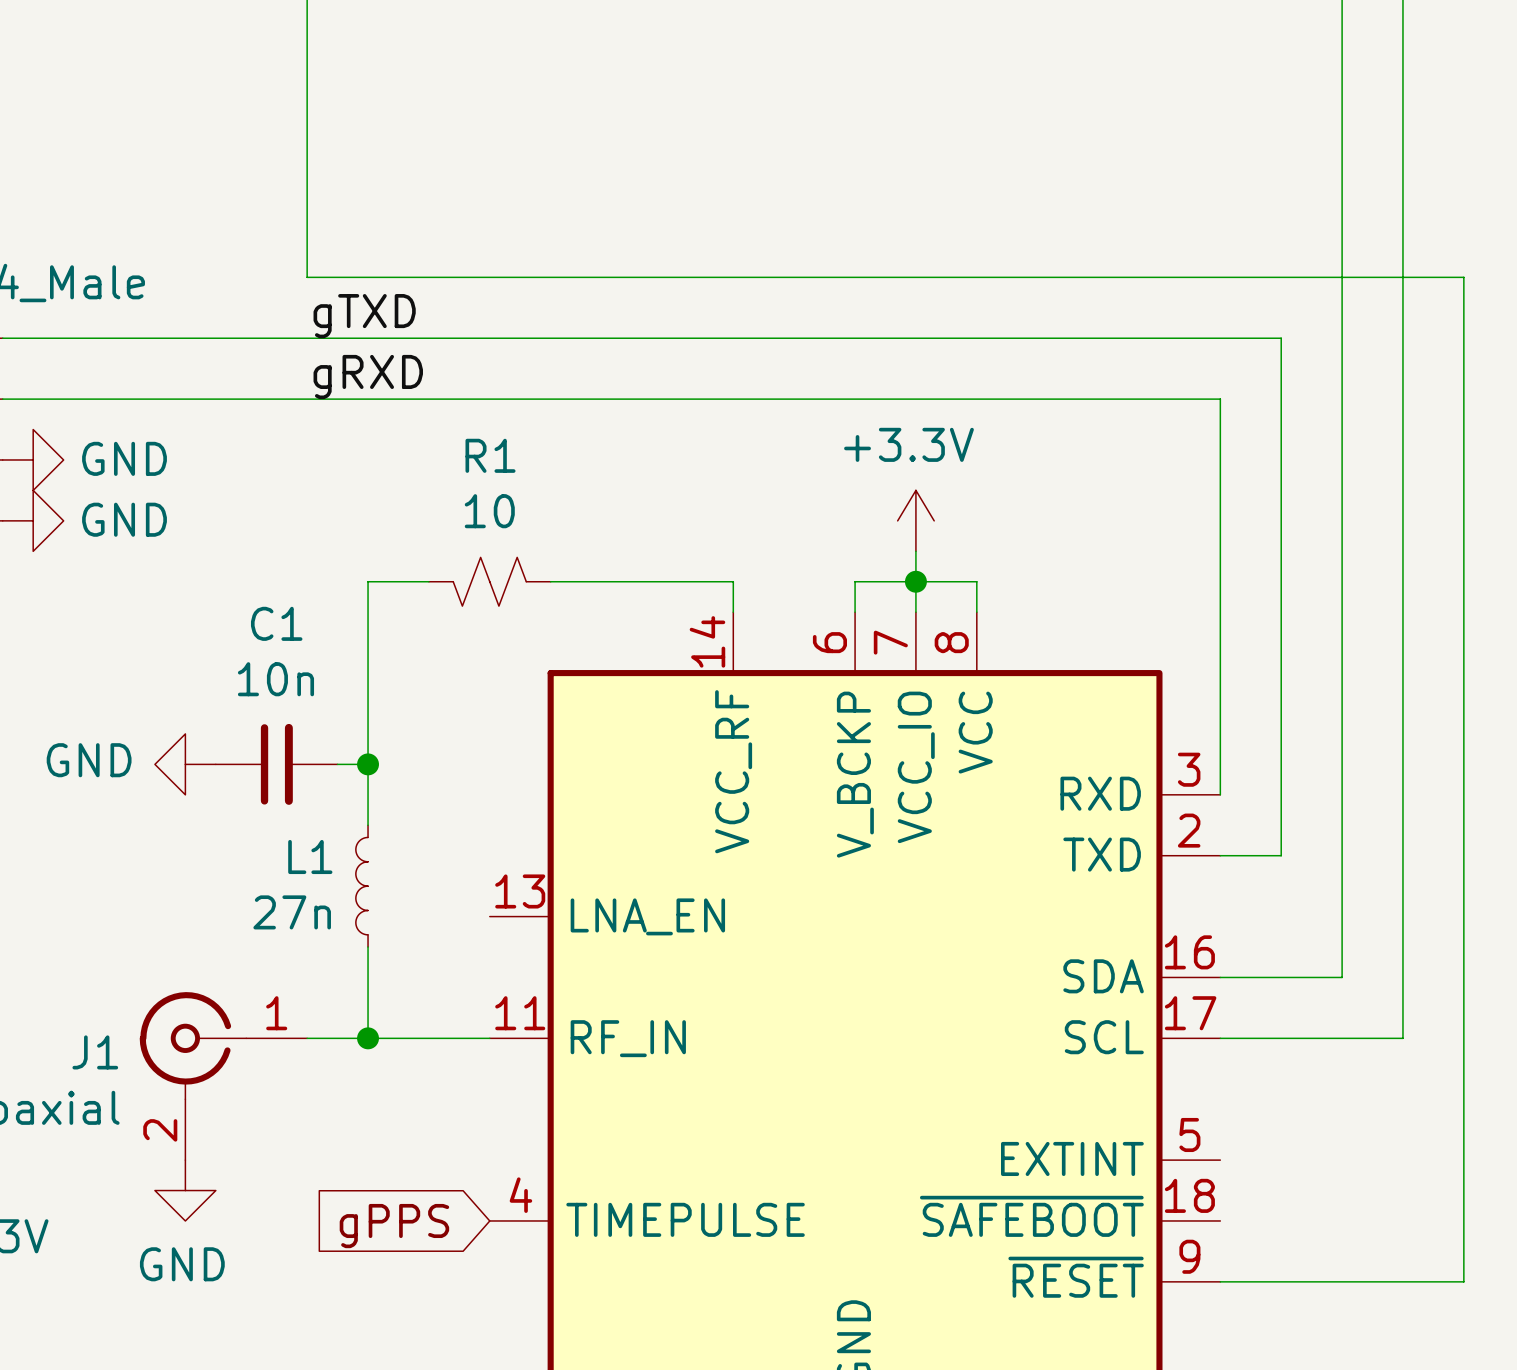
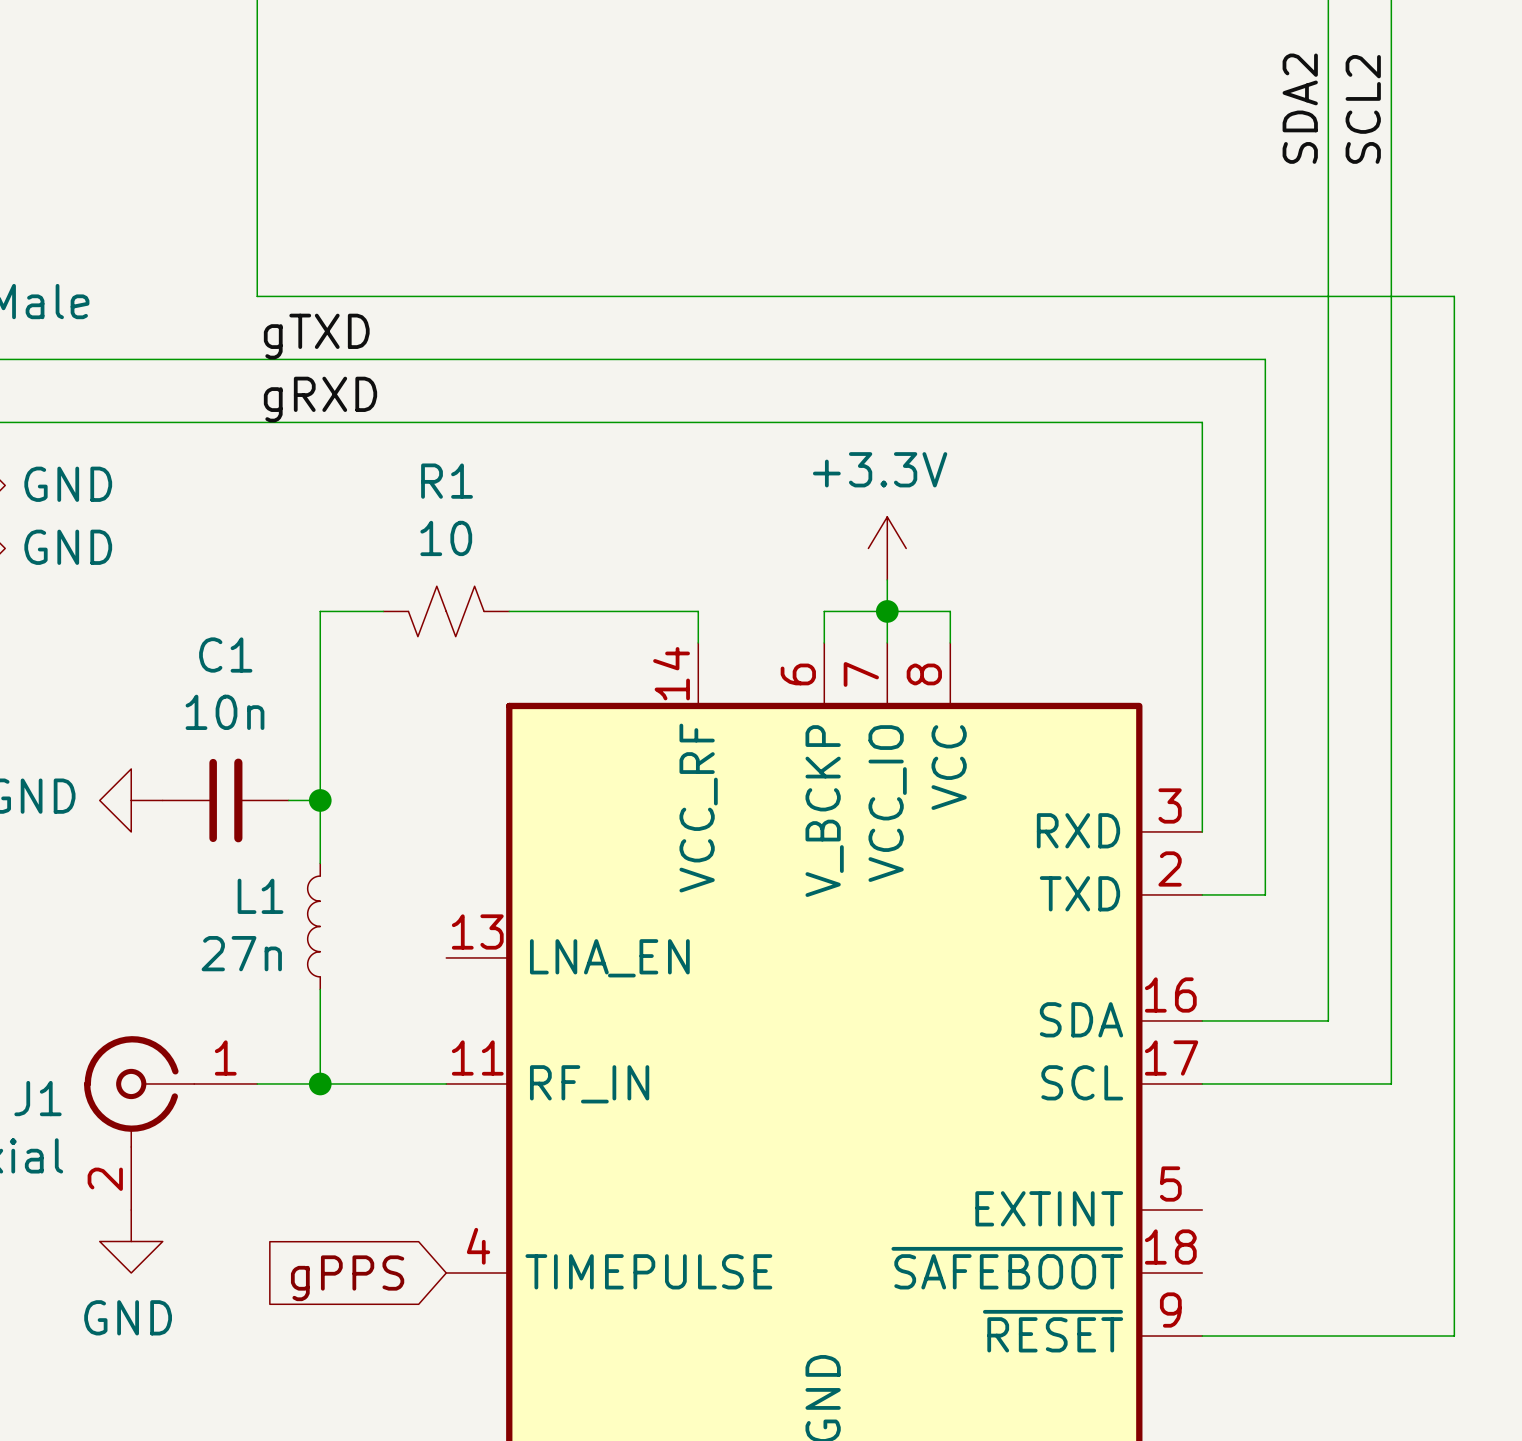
label: none -> SDA2 (1300, 108)
label: none -> SCL2 (1363, 109)

